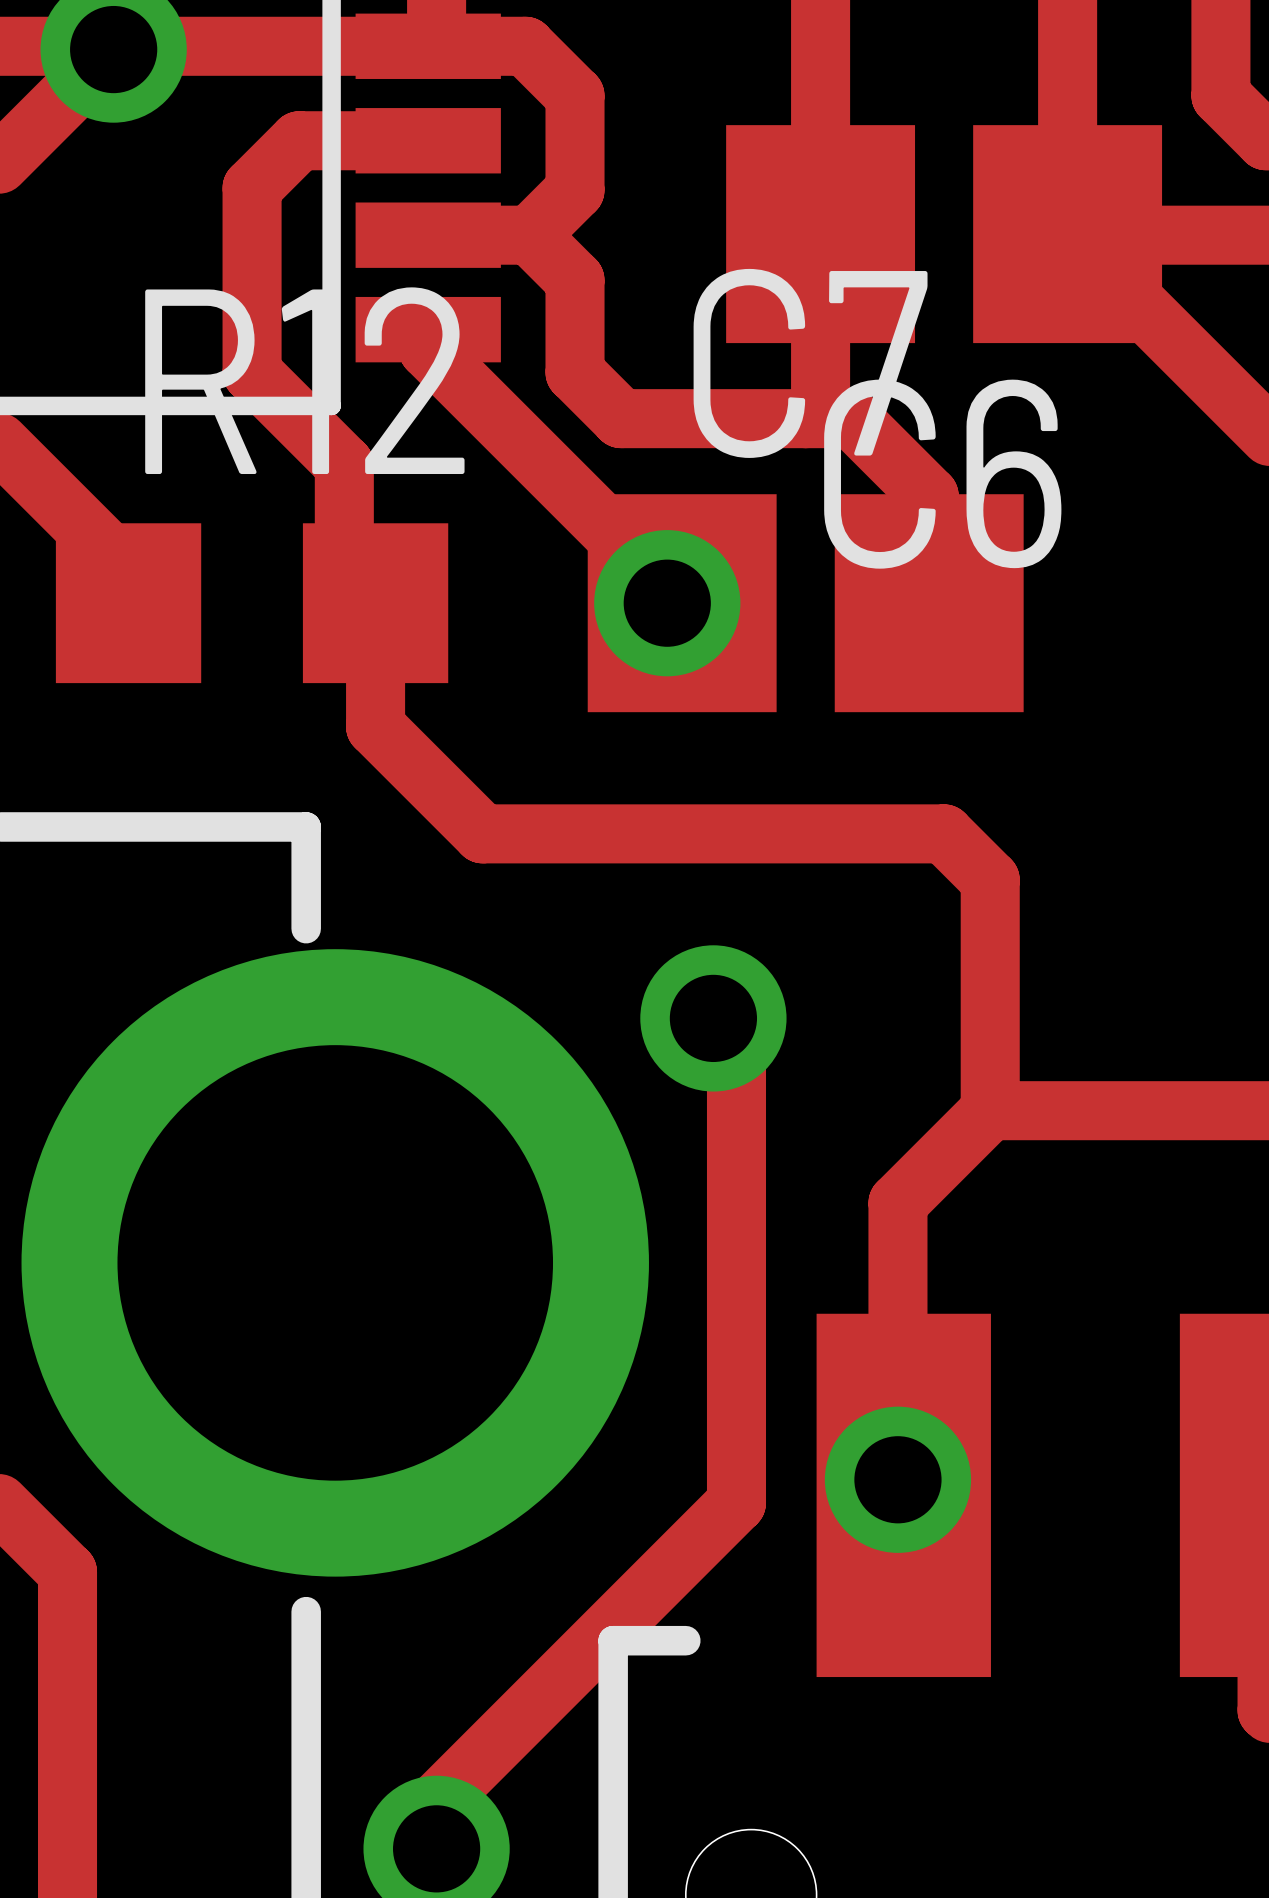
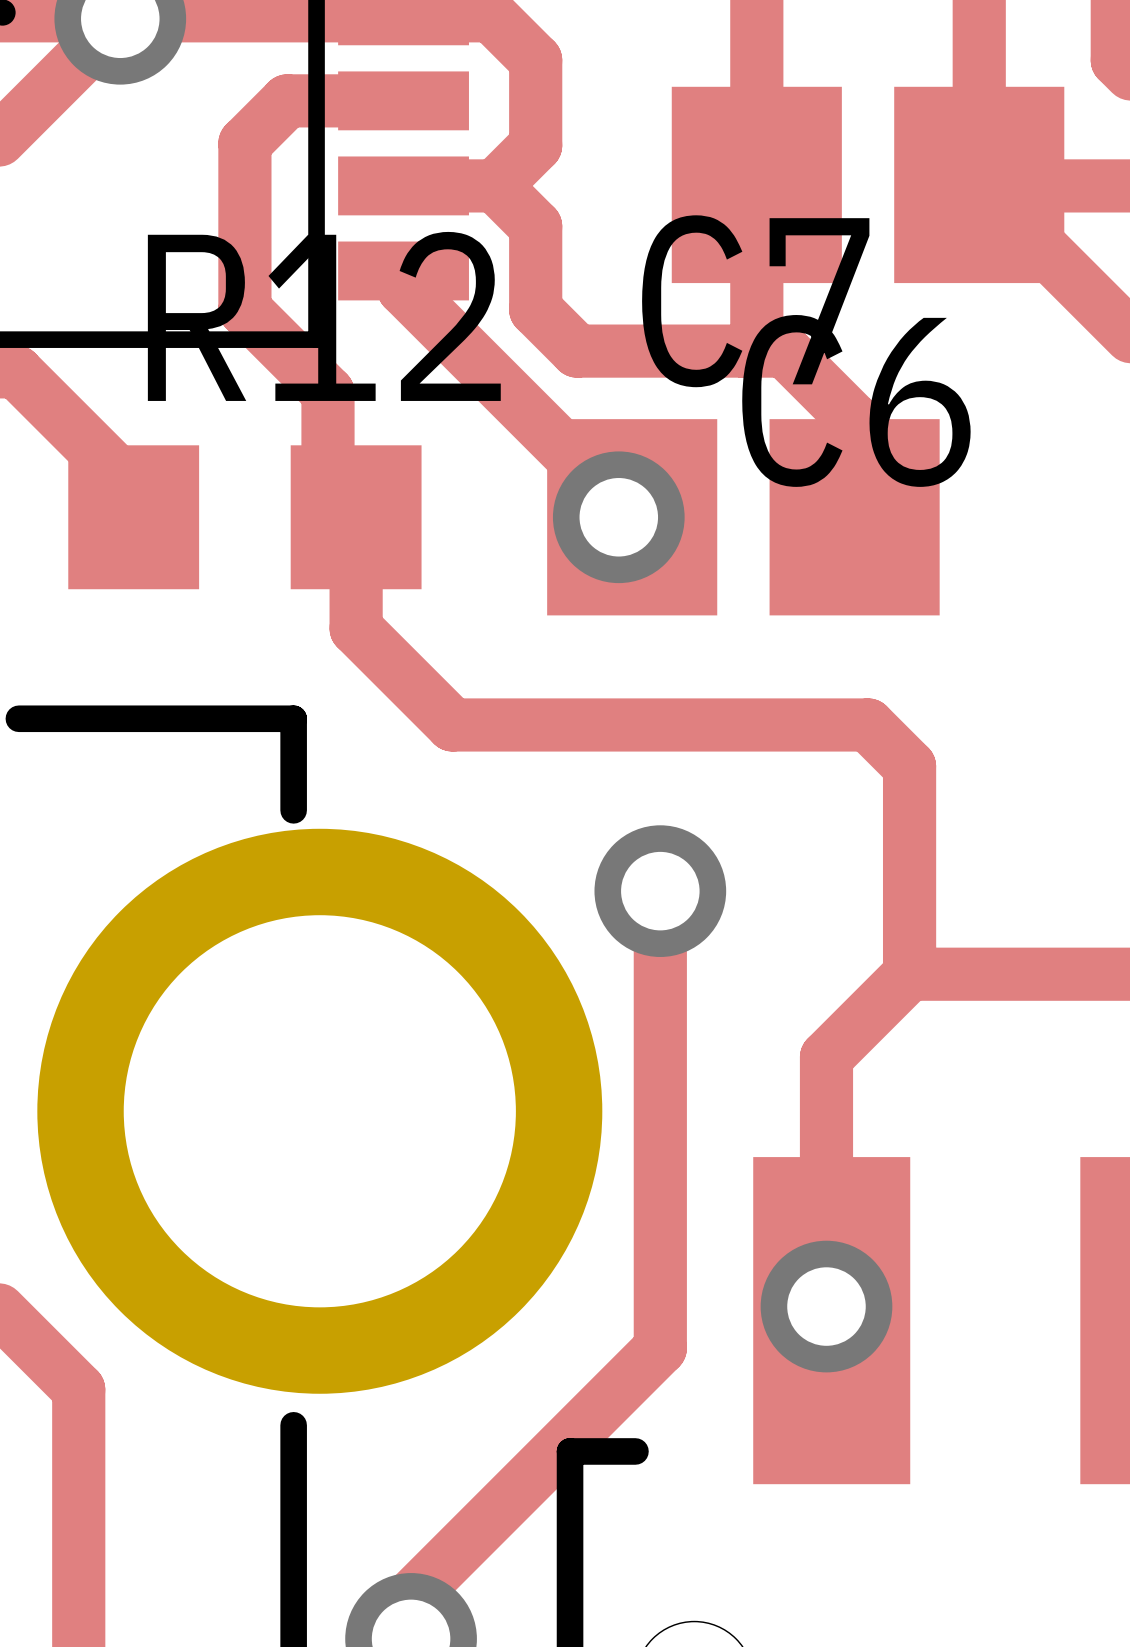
track: (713, 1018) (736, 1041) (736, 1502) (713, 1525) -> (660, 891) (660, 1348)

